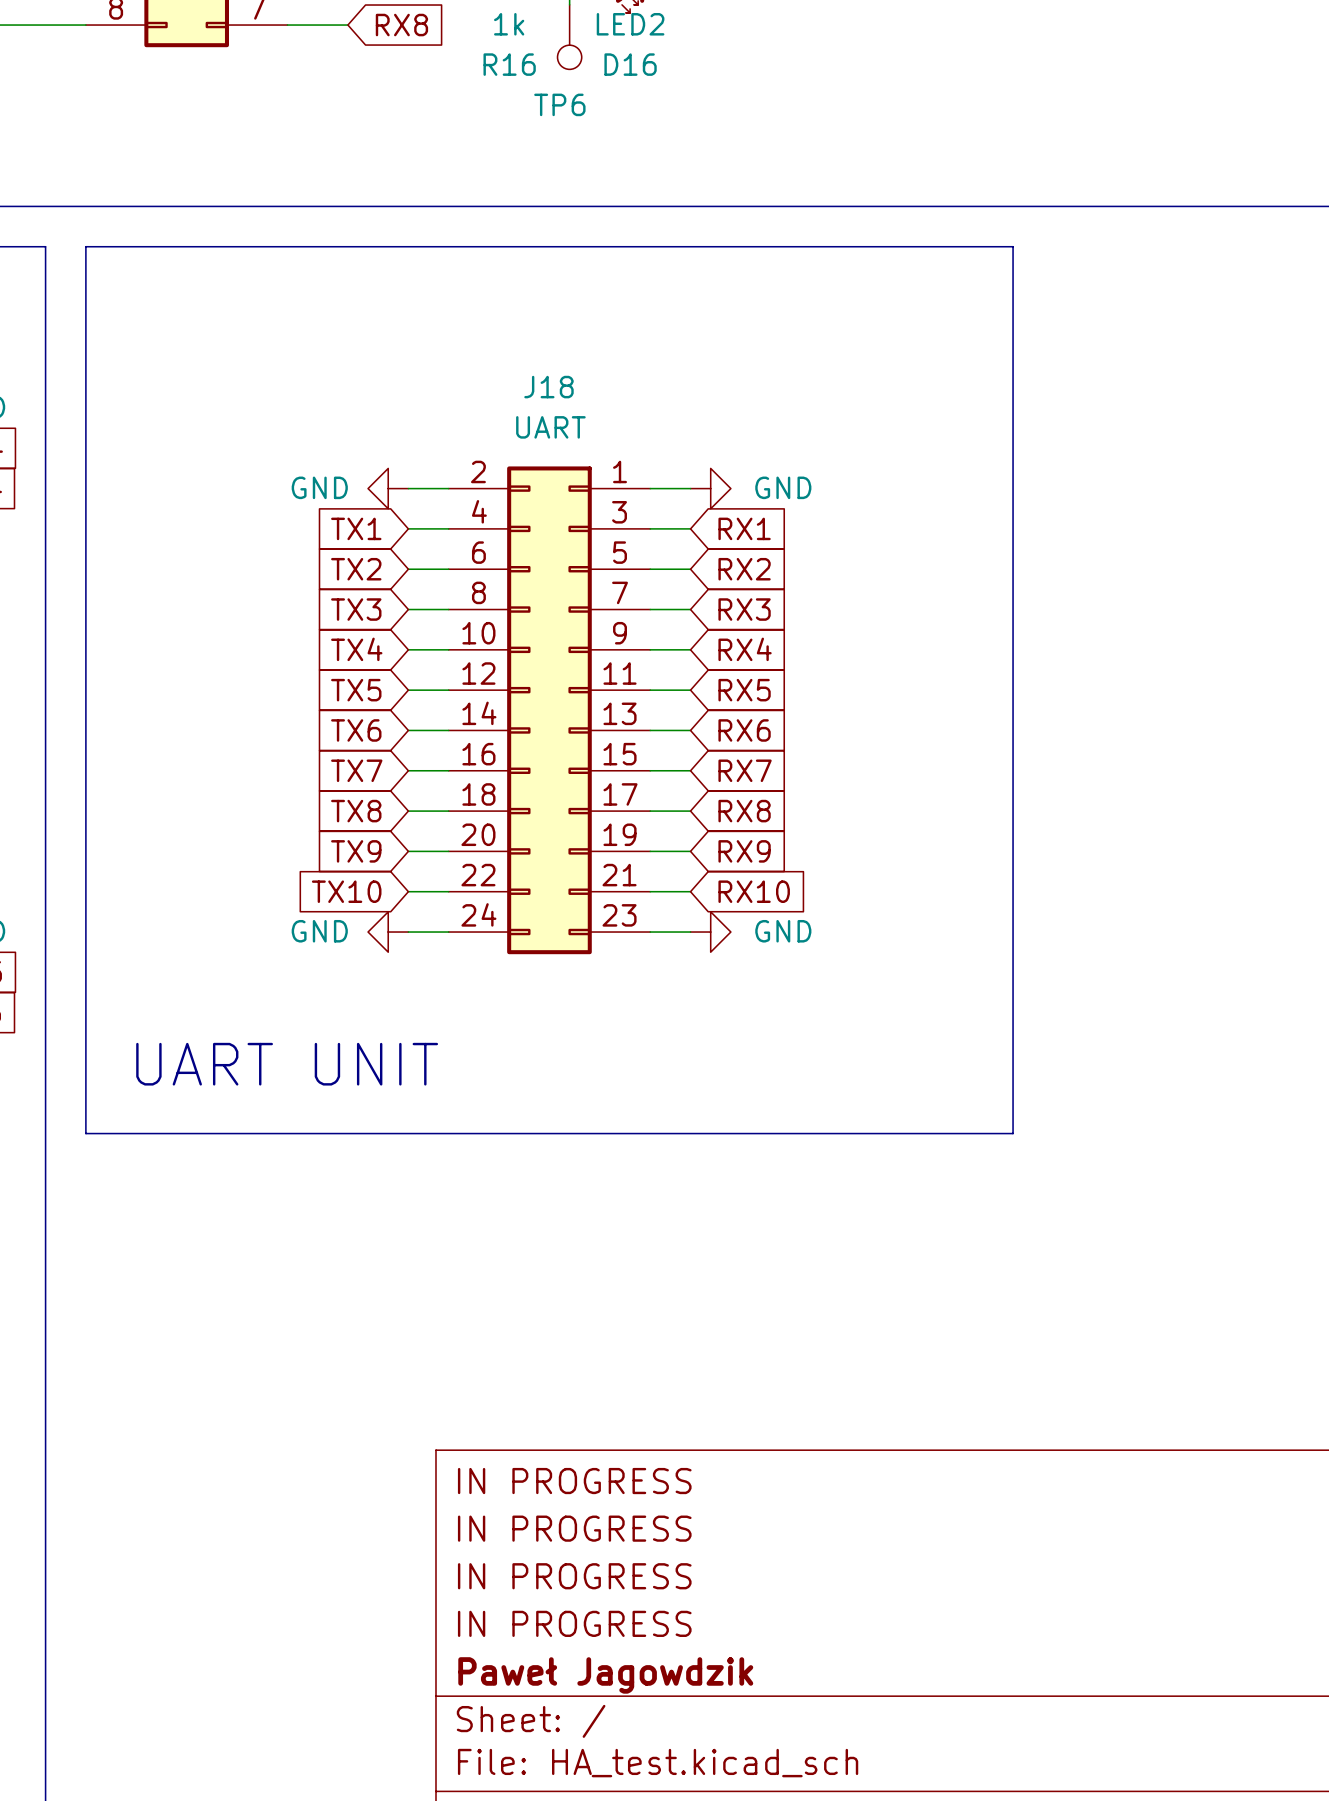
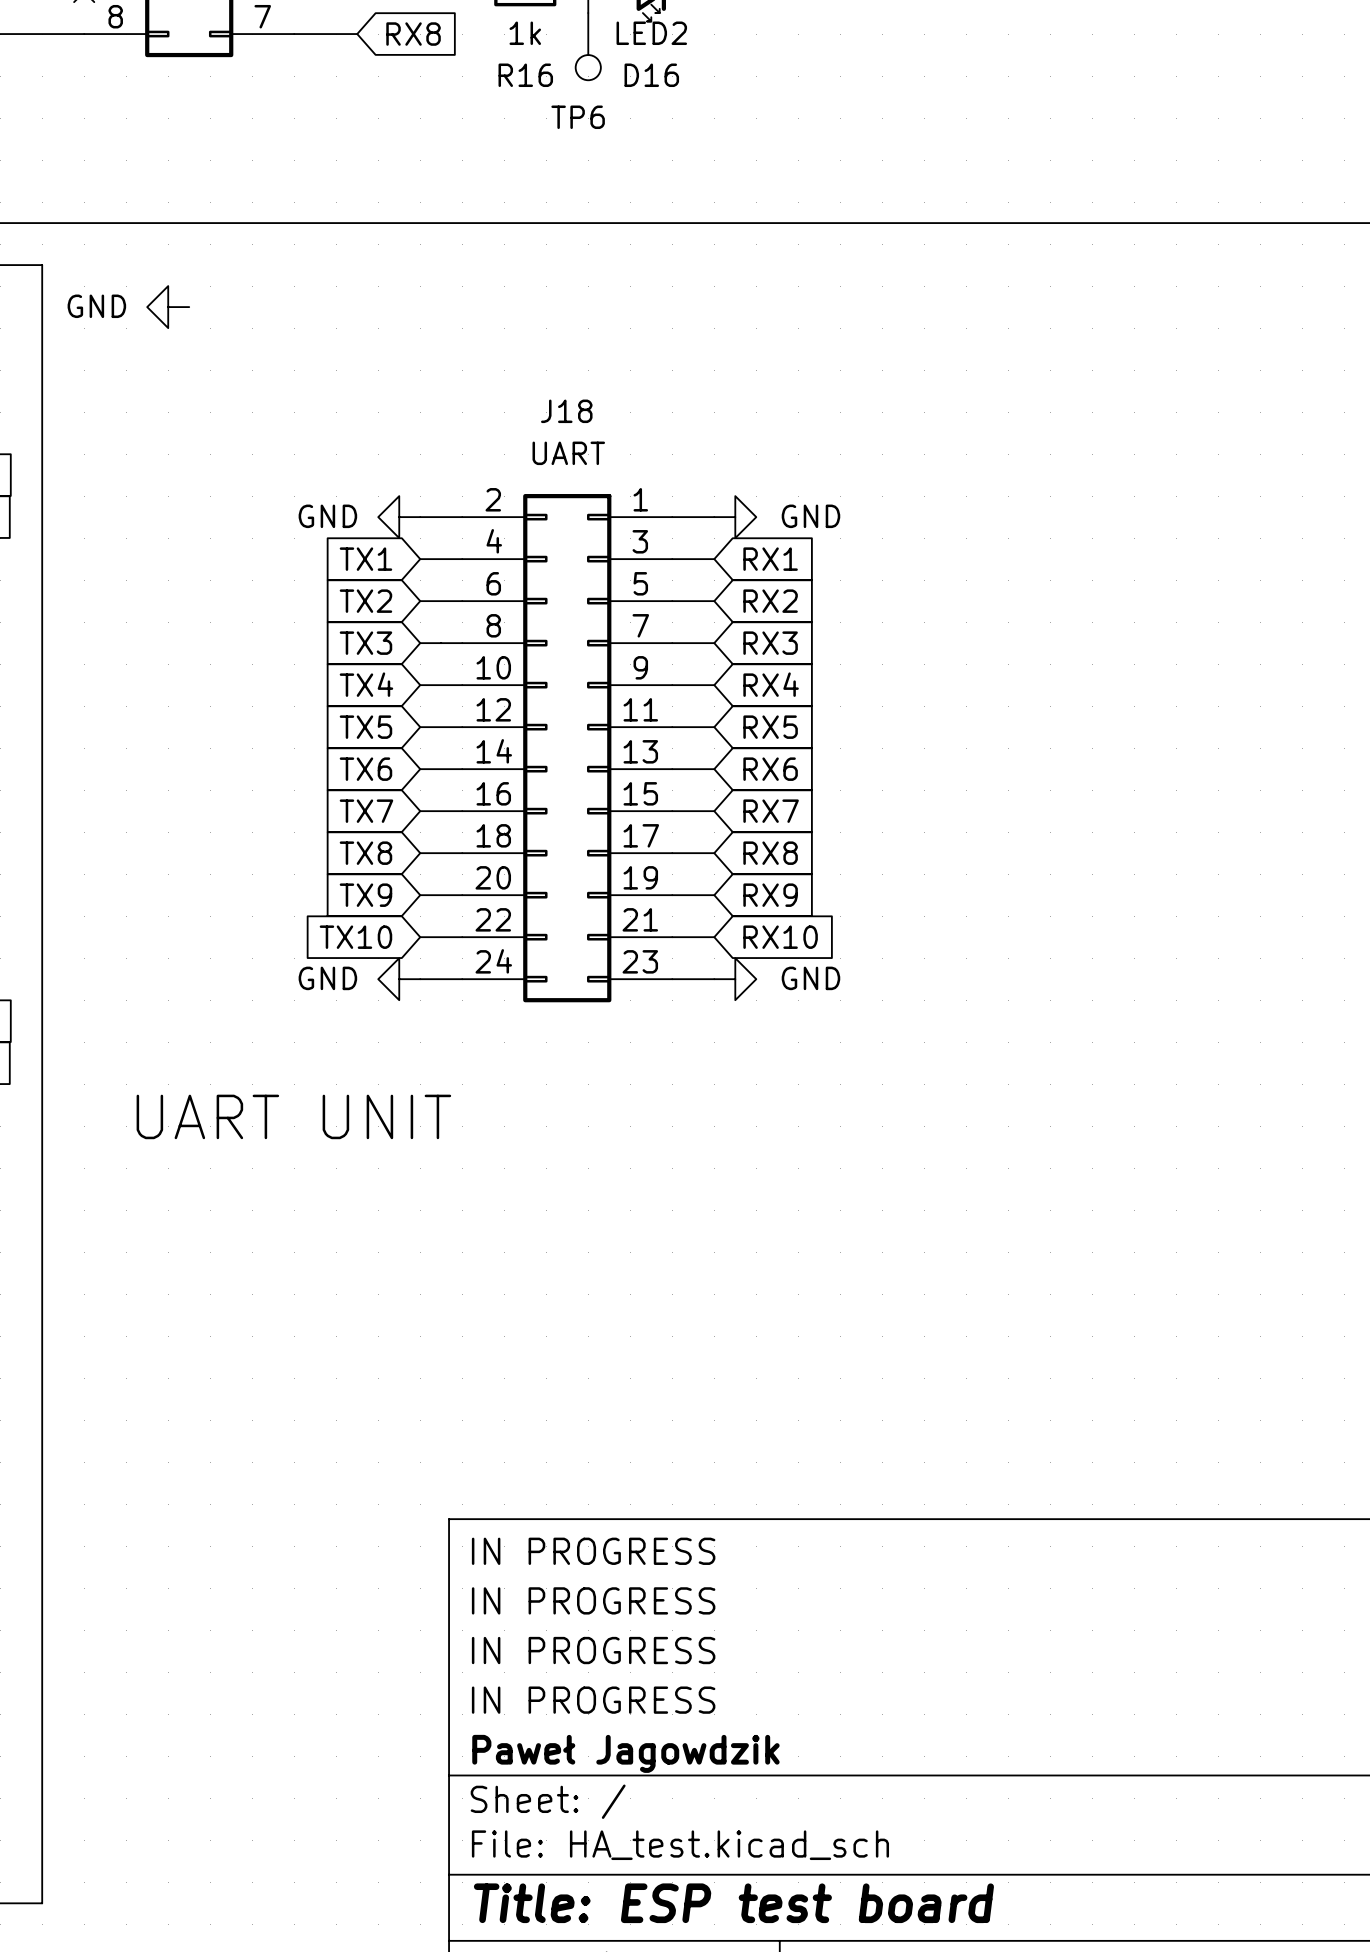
line: (85, 246) (1013, 246) (1013, 1133) (85, 1133) (85, 246) -> none
power symbol: none -> GND (168, 307)

